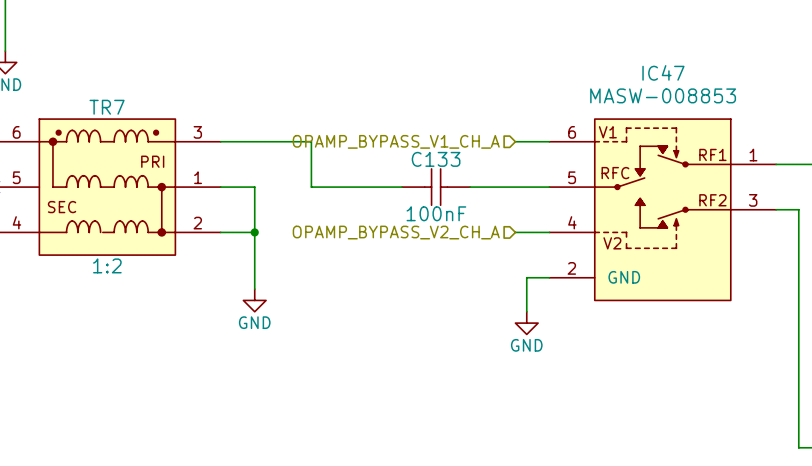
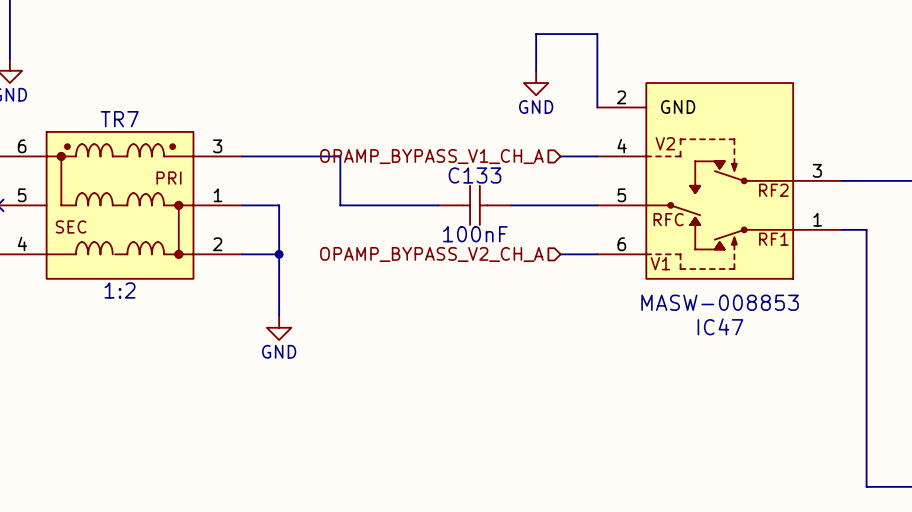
wire: none -> (536, 70) (536, 34) (597, 34) (597, 107)
power symbol: none -> GND (536, 83)
IC47 flip: as is (662, 209) -> up-down (719, 180)
wire: (549, 277) (526, 277) (526, 311) -> none
power symbol: GND (526, 323) -> none

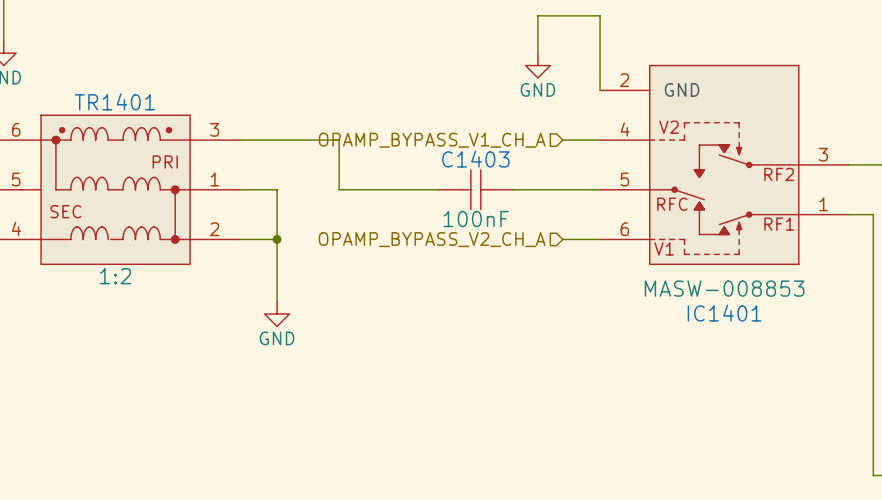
TR7 name: TR7 (119, 119) -> TR1401 (114, 101)
C133 name: C133 (474, 175) -> C1403 (475, 159)
IC47 name: IC47 (720, 326) -> IC1401 (724, 313)

